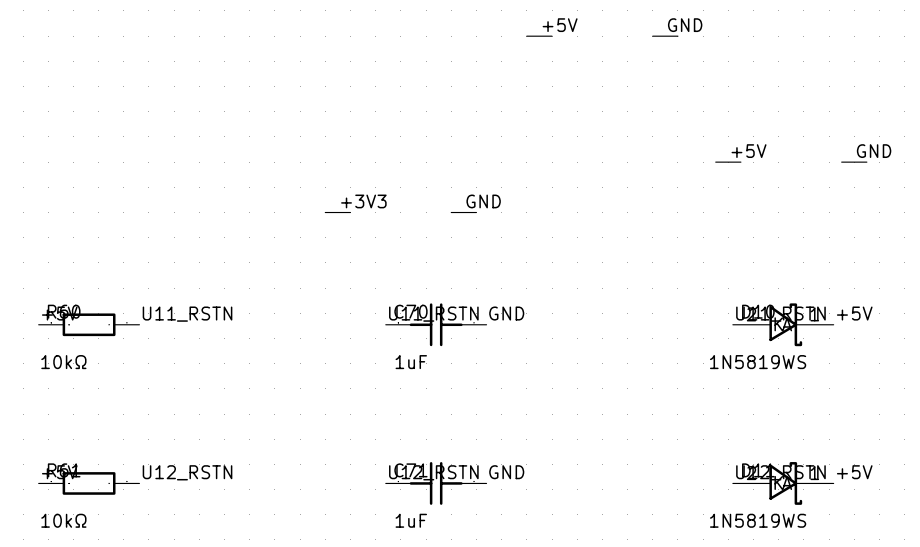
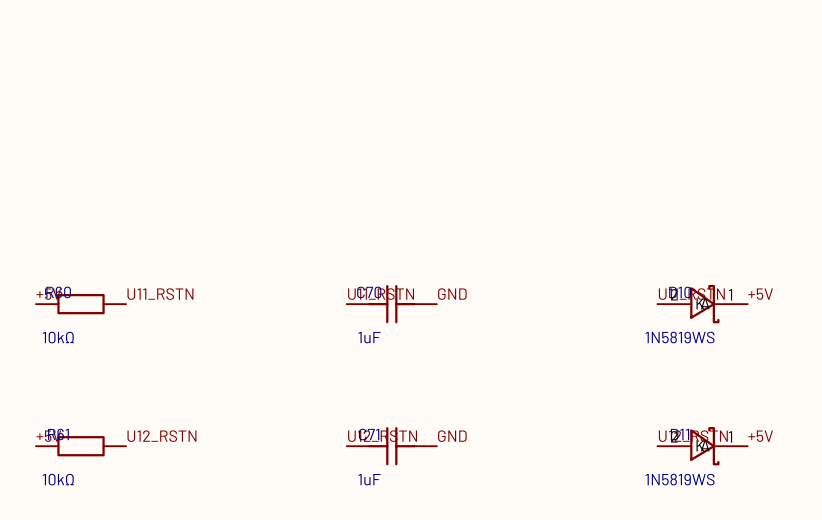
label: +5V (560, 25) -> none
label: GND (685, 25) -> none
wire: (526, 36) (552, 36) -> none
wire: (652, 36) (677, 36) -> none
label: +5V (749, 151) -> none
label: GND (874, 151) -> none
wire: (715, 162) (740, 162) -> none
wire: (841, 162) (866, 162) -> none
label: +3V3 (363, 201) -> none
label: GND (483, 201) -> none
wire: (325, 212) (350, 212) -> none
wire: (451, 212) (476, 212) -> none

